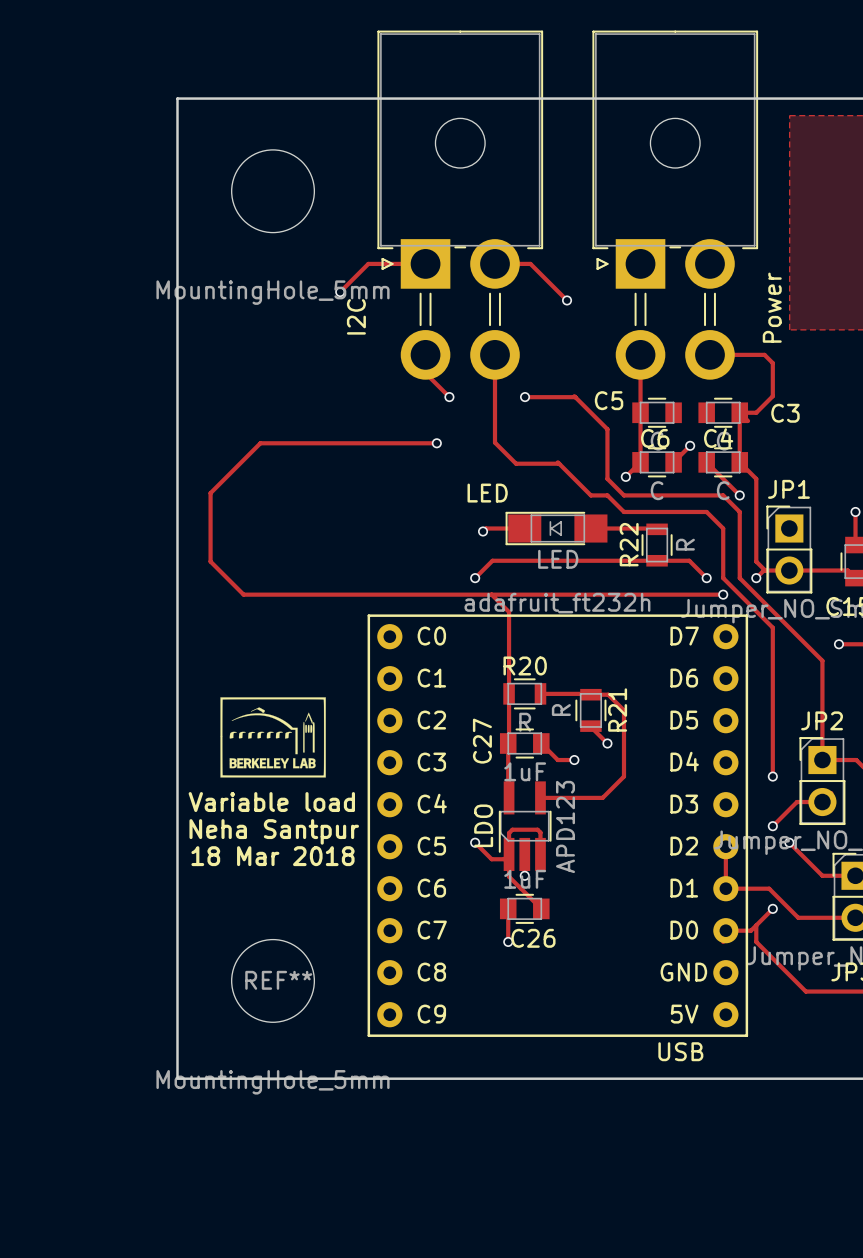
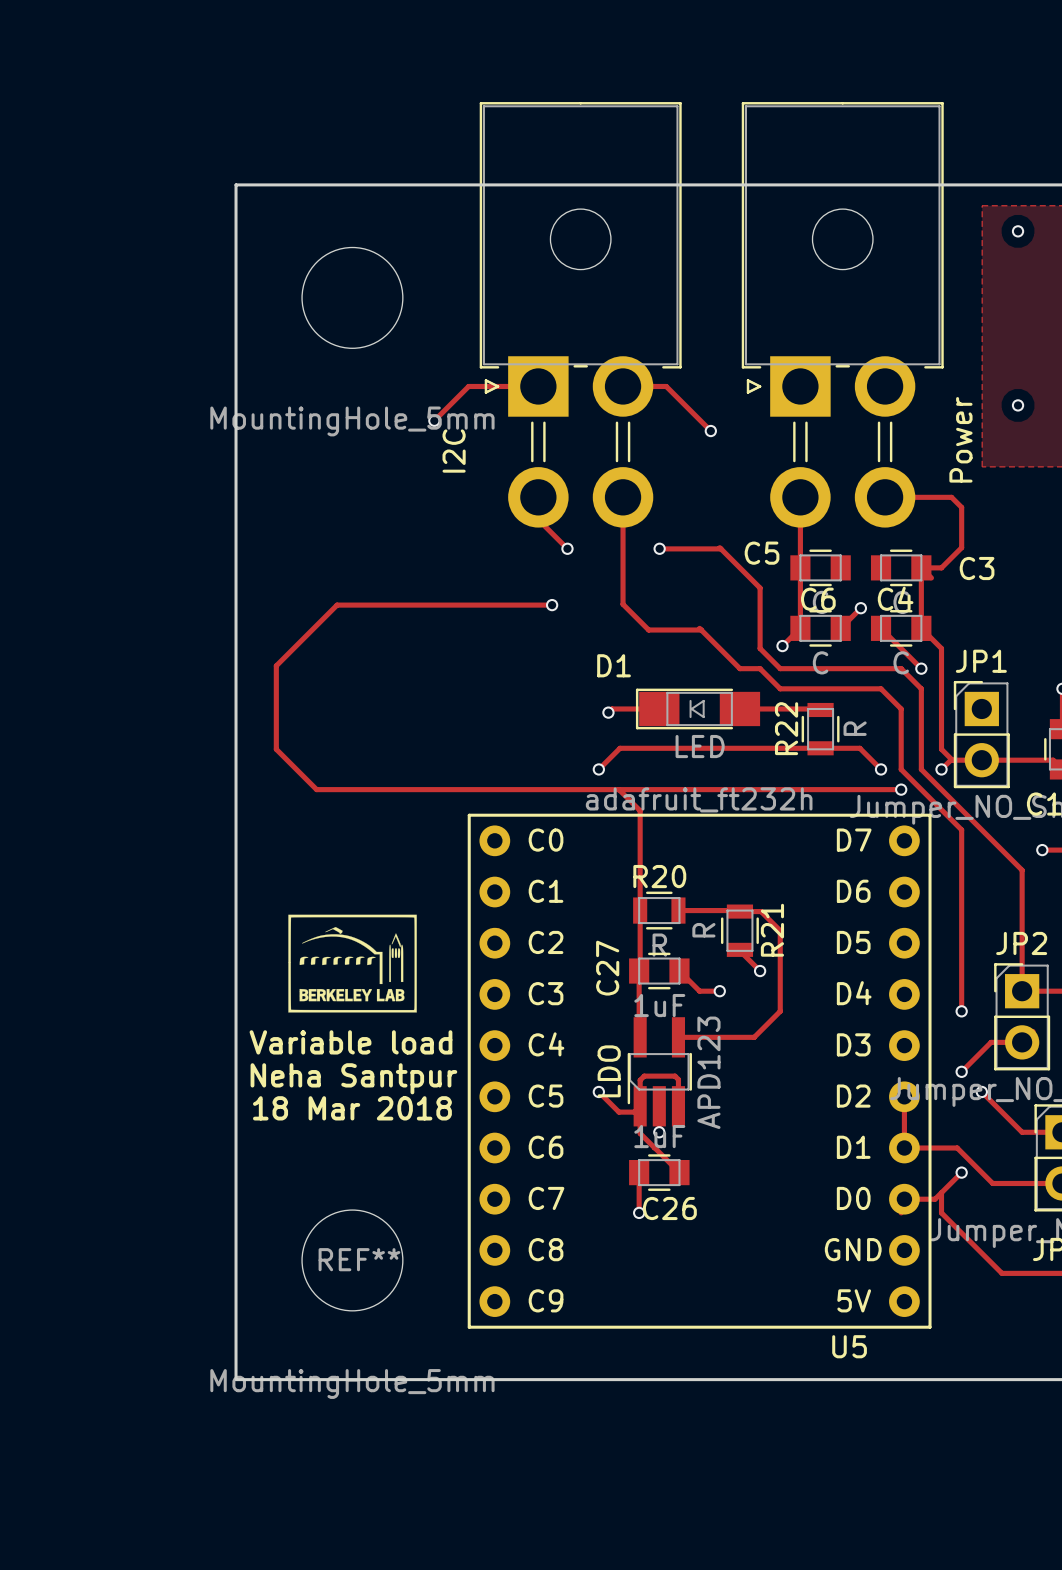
via: none -> (1018, 231)
via: none -> (1018, 405)
LED name: LED (487, 493) -> D1 (614, 665)
USB name: USB (680, 1051) -> U5 (849, 1346)

